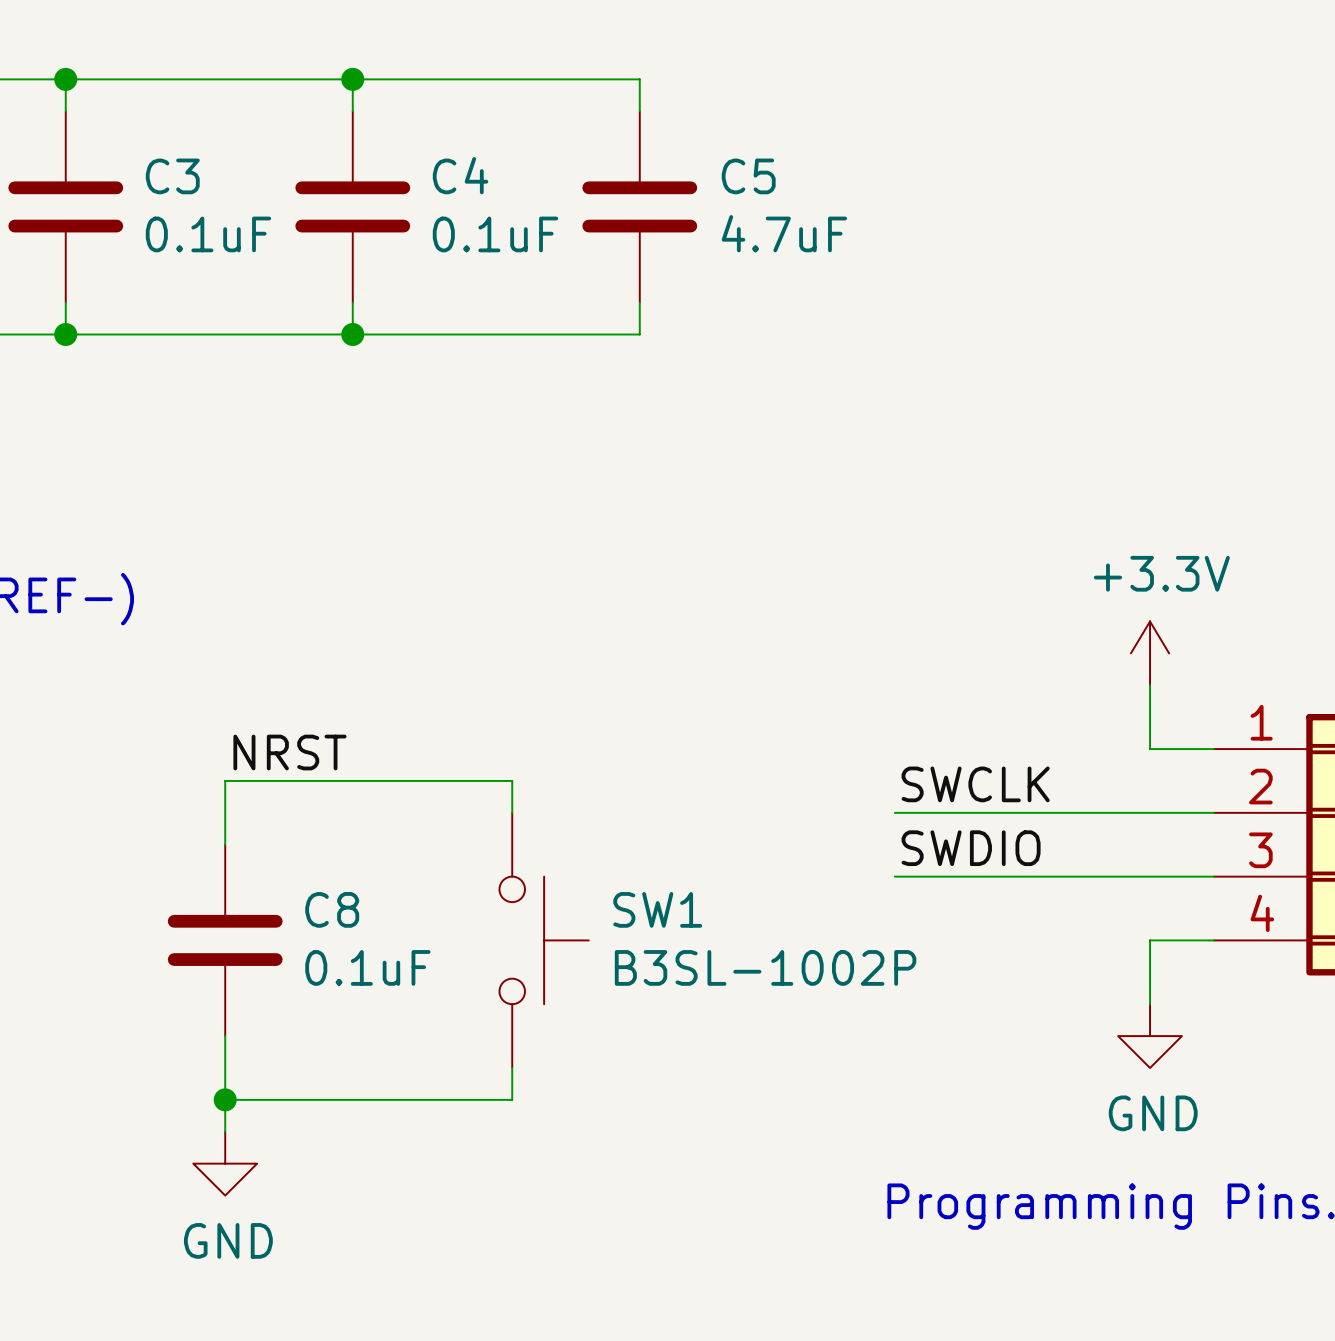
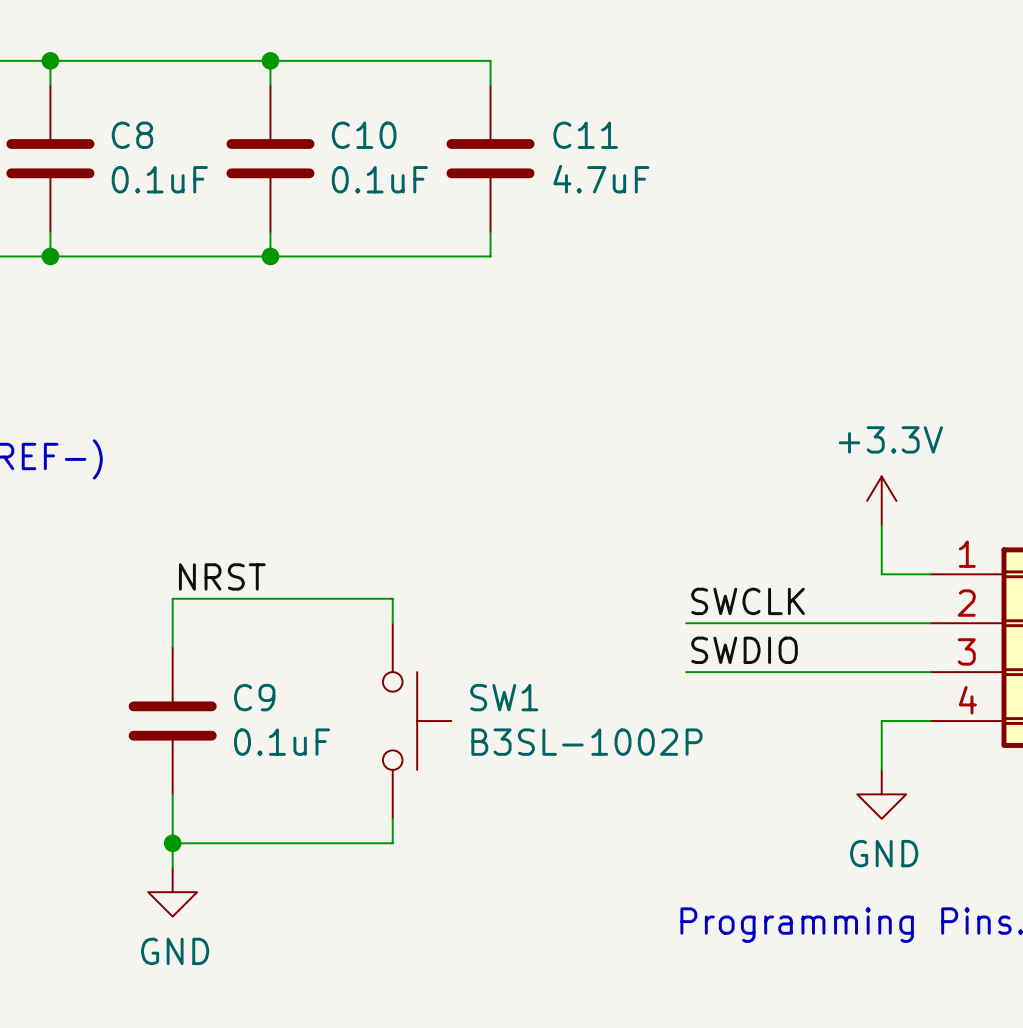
C4 name: C4 (460, 175) -> C10 (364, 135)
C3 name: C3 (172, 176) -> C8 (132, 135)
C5 name: C5 (748, 176) -> C11 (585, 135)
C8 name: C8 (332, 909) -> C9 (254, 697)

